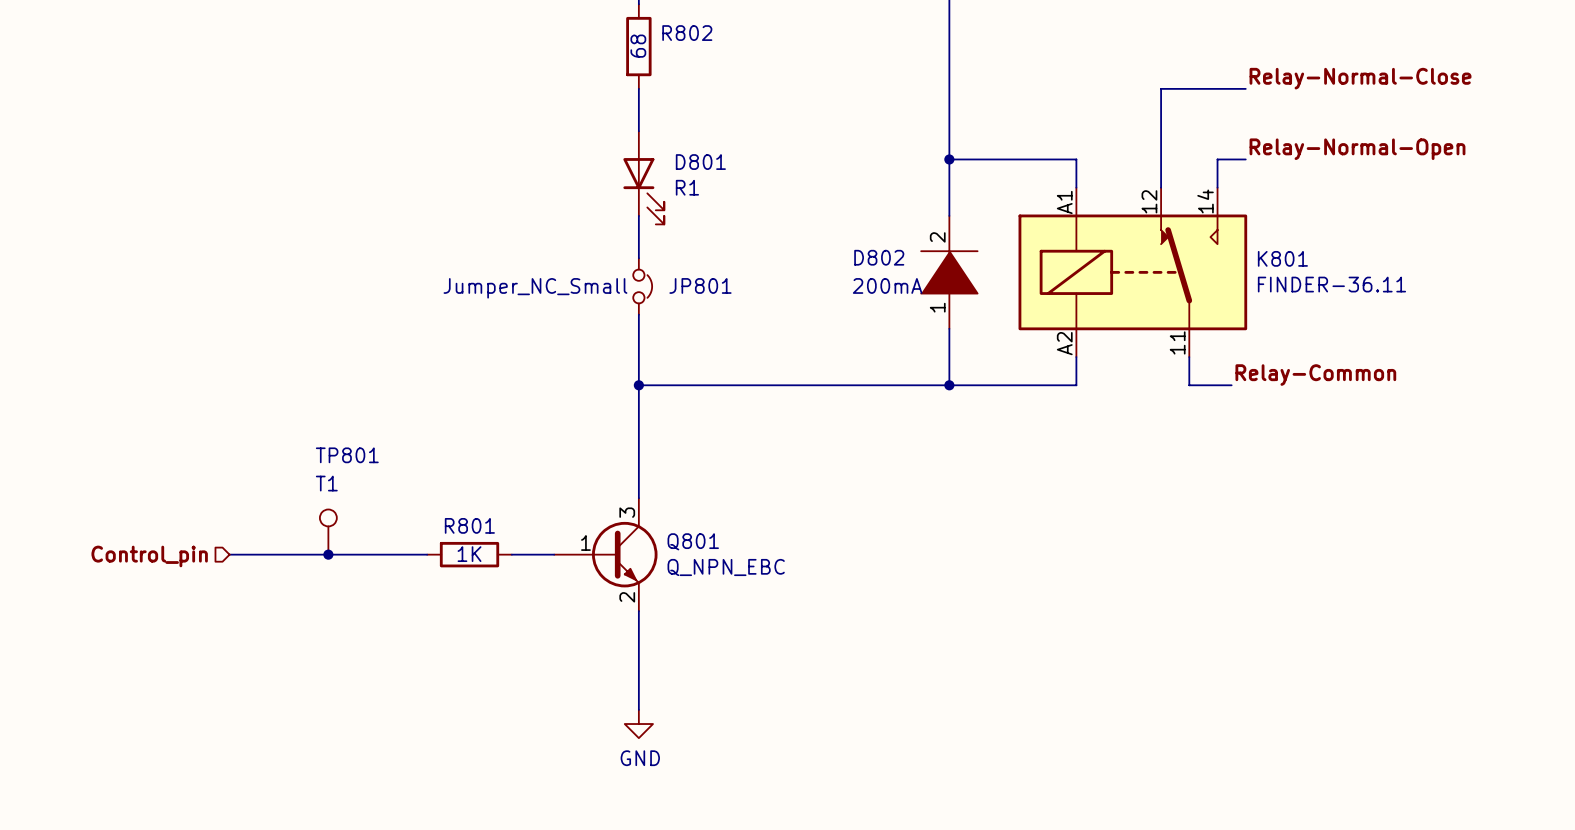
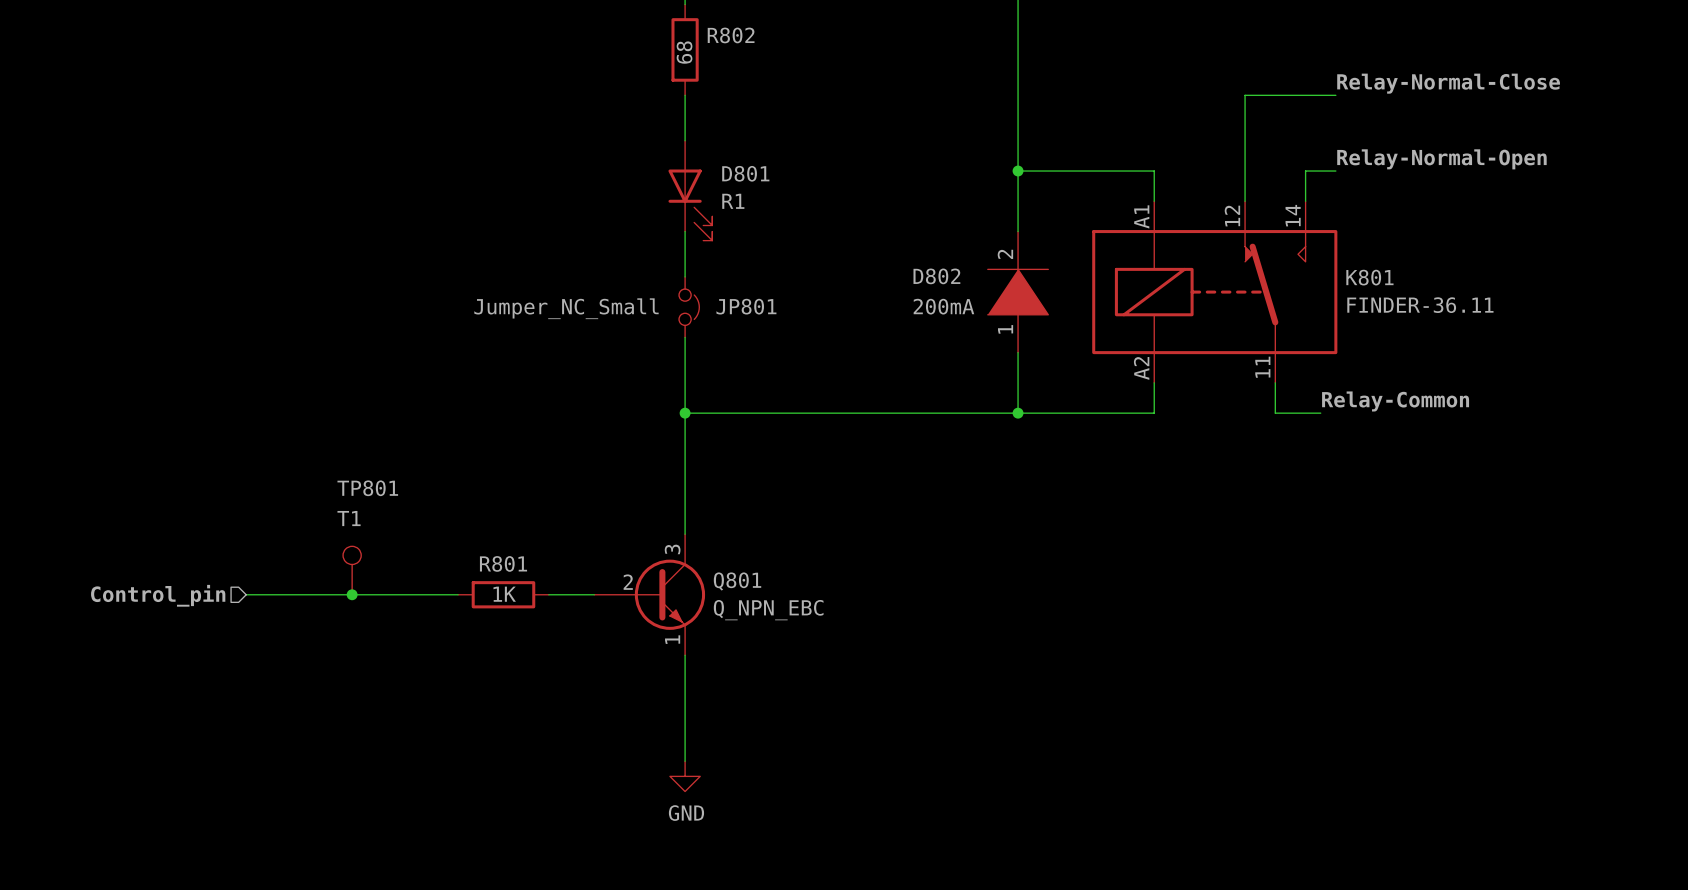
Q801 pin number: 1 (585, 543) -> 2 (628, 582)
Q801 pin number: 2 (627, 597) -> 1 (672, 639)

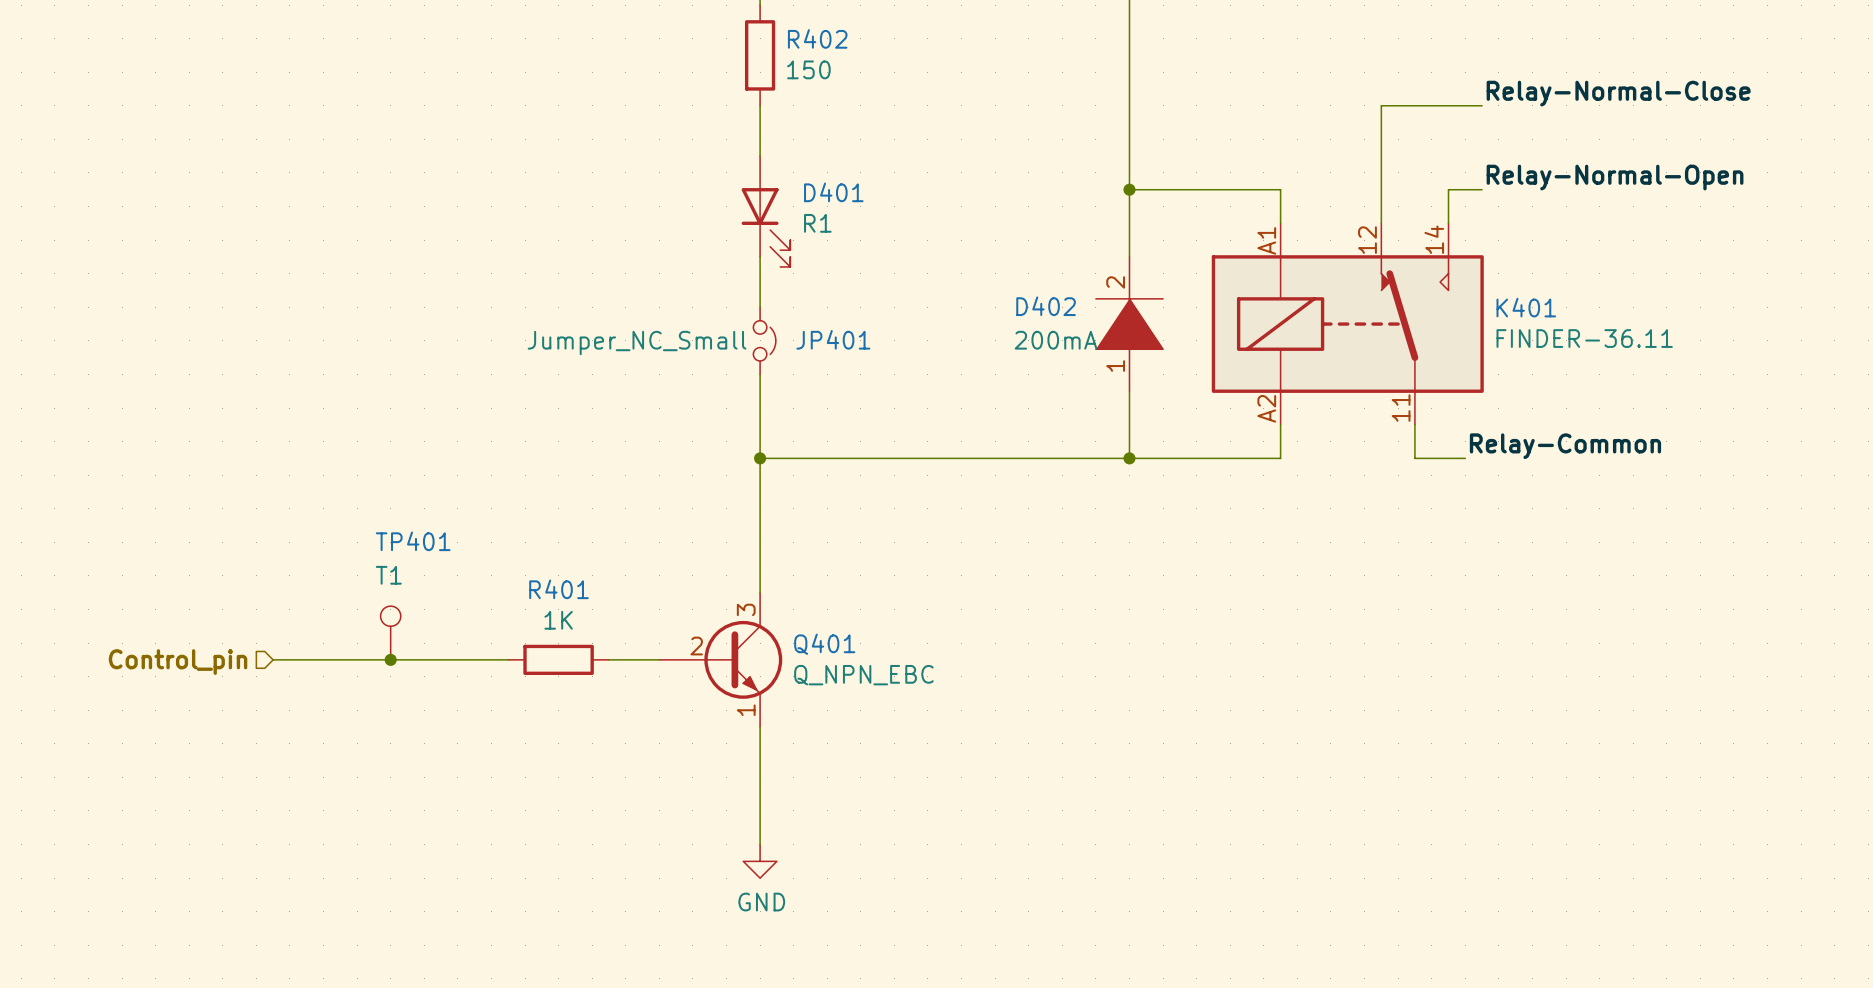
R802 name: R802 (731, 35) -> R402 (817, 38)
R802 value: 68 (684, 52) -> 150 (808, 69)
D801 name: D801 (745, 173) -> D401 (833, 192)
D802 name: D802 (936, 276) -> D402 (1046, 306)
K801 name: K801 (1369, 277) -> K401 (1526, 307)
JP801 name: JP801 (746, 306) -> JP401 (833, 339)
TP801 name: TP801 (367, 488) -> TP401 (413, 541)
R801 name: R801 (503, 563) -> R401 (558, 589)
Q801 name: Q801 (737, 581) -> Q401 (824, 644)
R801 value position: 1K (504, 594) -> 1K (558, 620)

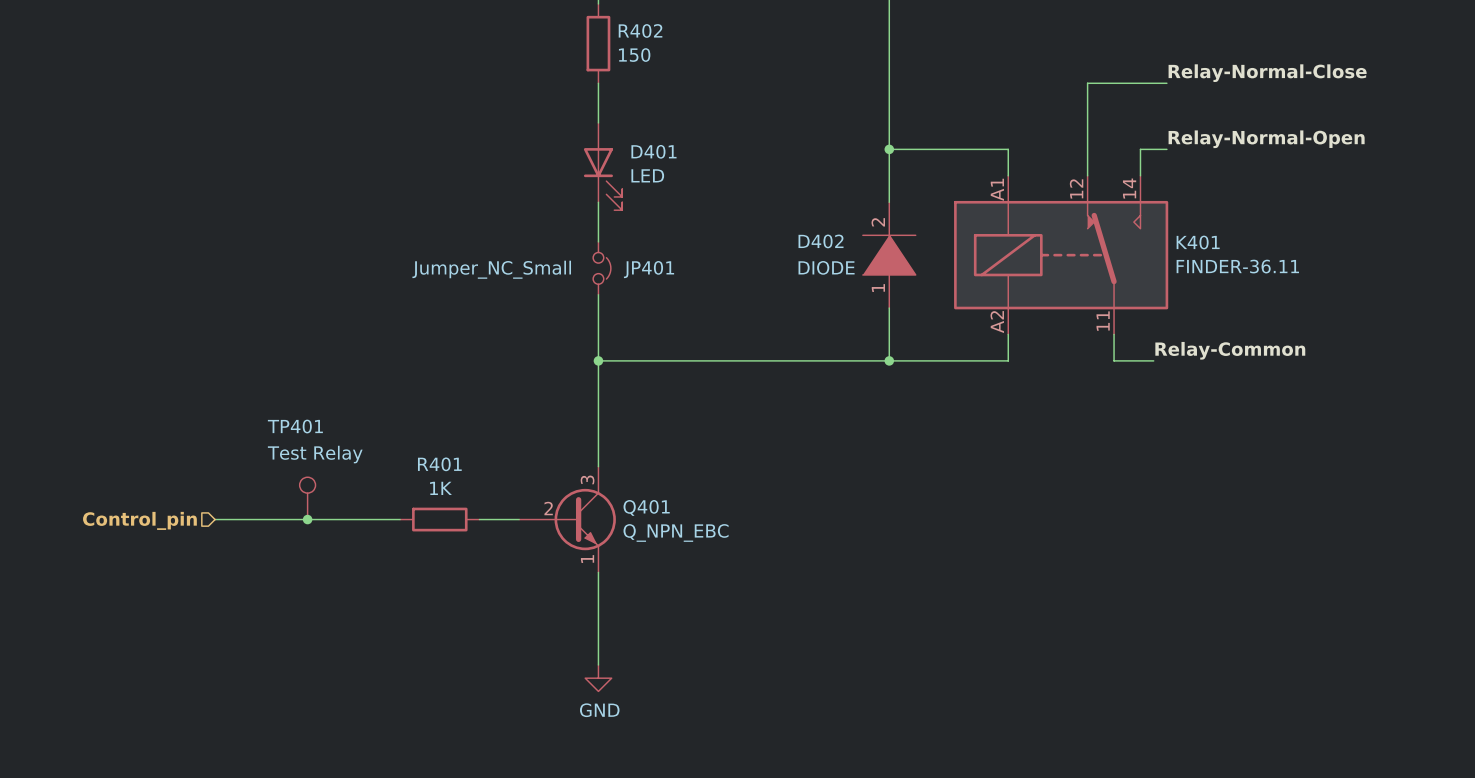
D401 value: R1 (817, 223) -> LED (647, 175)
D402 value: 200mA (1056, 340) -> DIODE (826, 267)
TP401 name position: TP401 (413, 541) -> TP401 (295, 426)
TP401 value: T1 (388, 575) -> Test Relay (315, 454)

